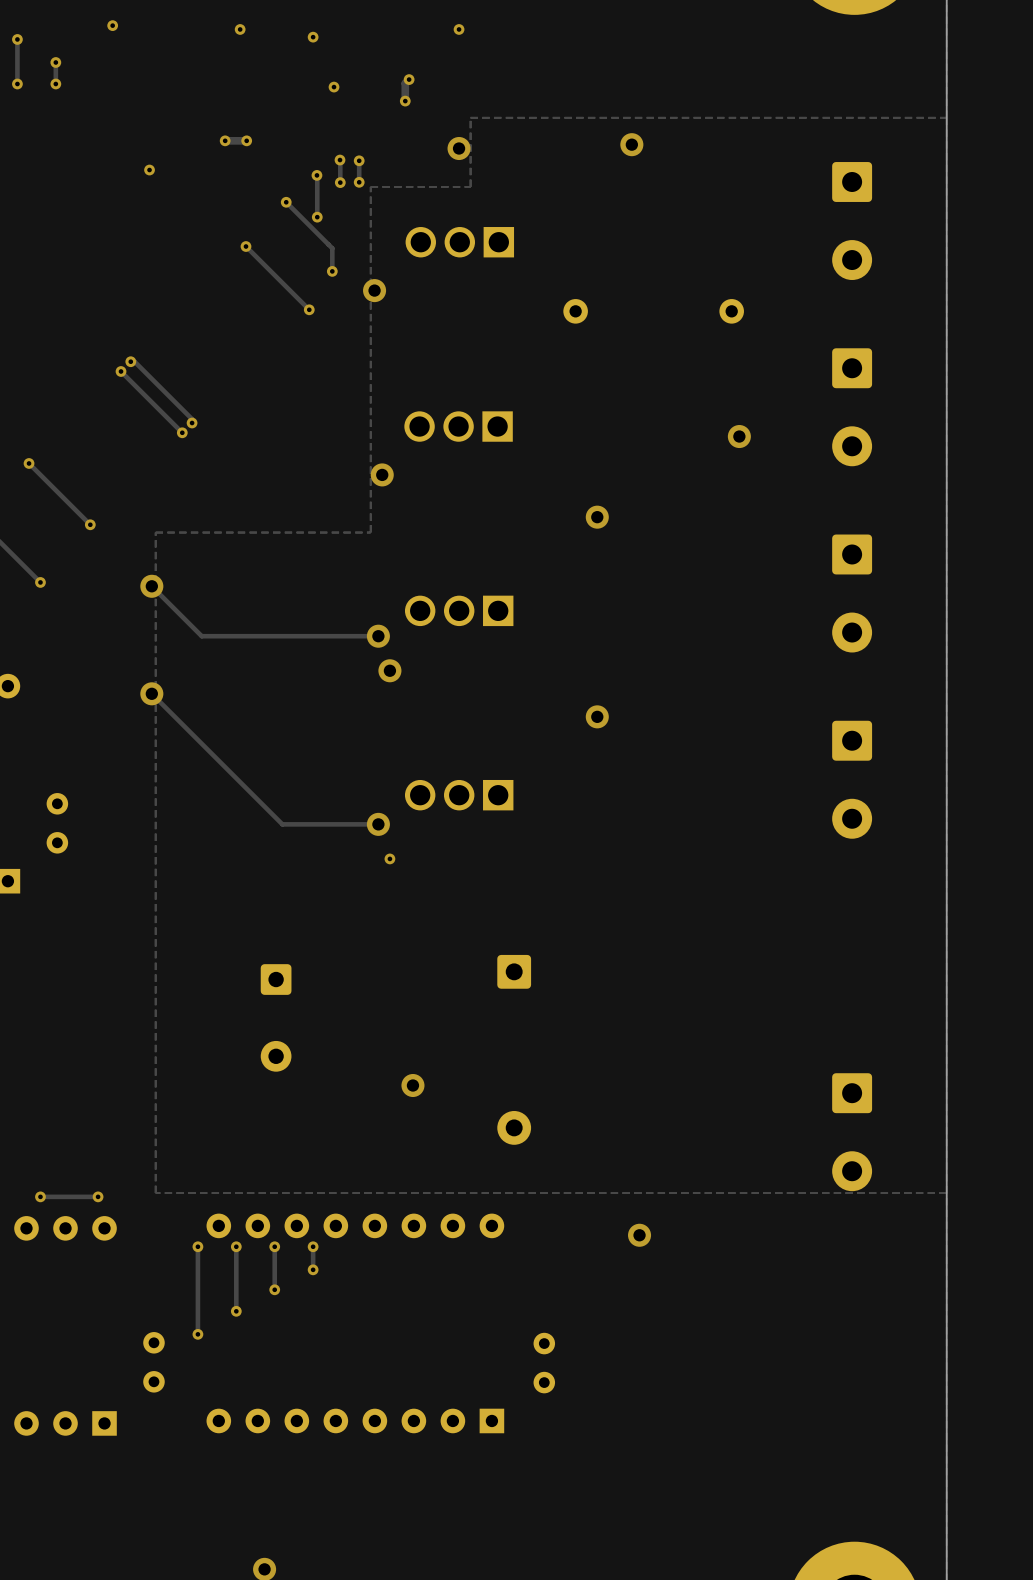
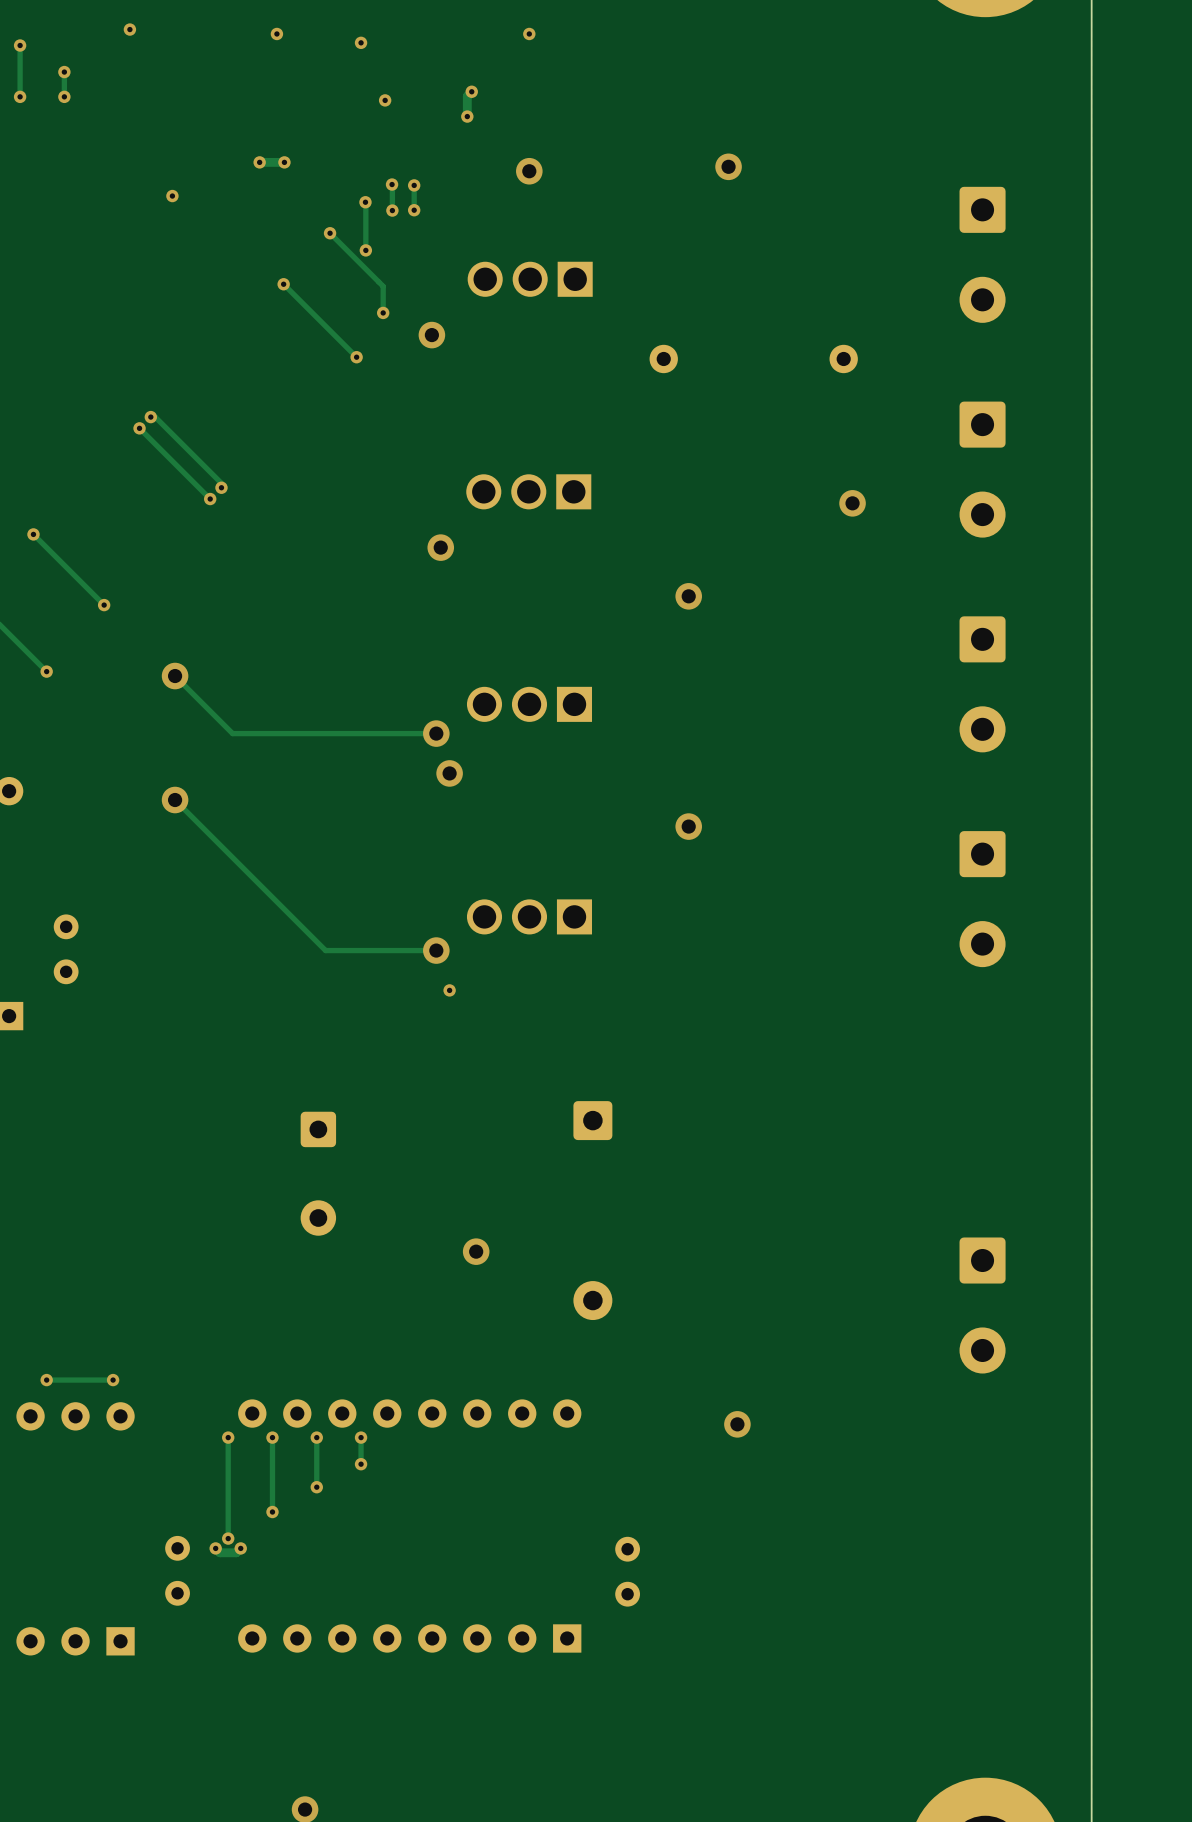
zone outline: (946, 117) (470, 117) (470, 186) (370, 186) (370, 532) (155, 532) (155, 1193) (946, 1193) -> none
via: none -> (215, 1548)
track: none -> (240, 1548) (236, 1552) (220, 1552) (215, 1548)
via: none -> (240, 1548)

